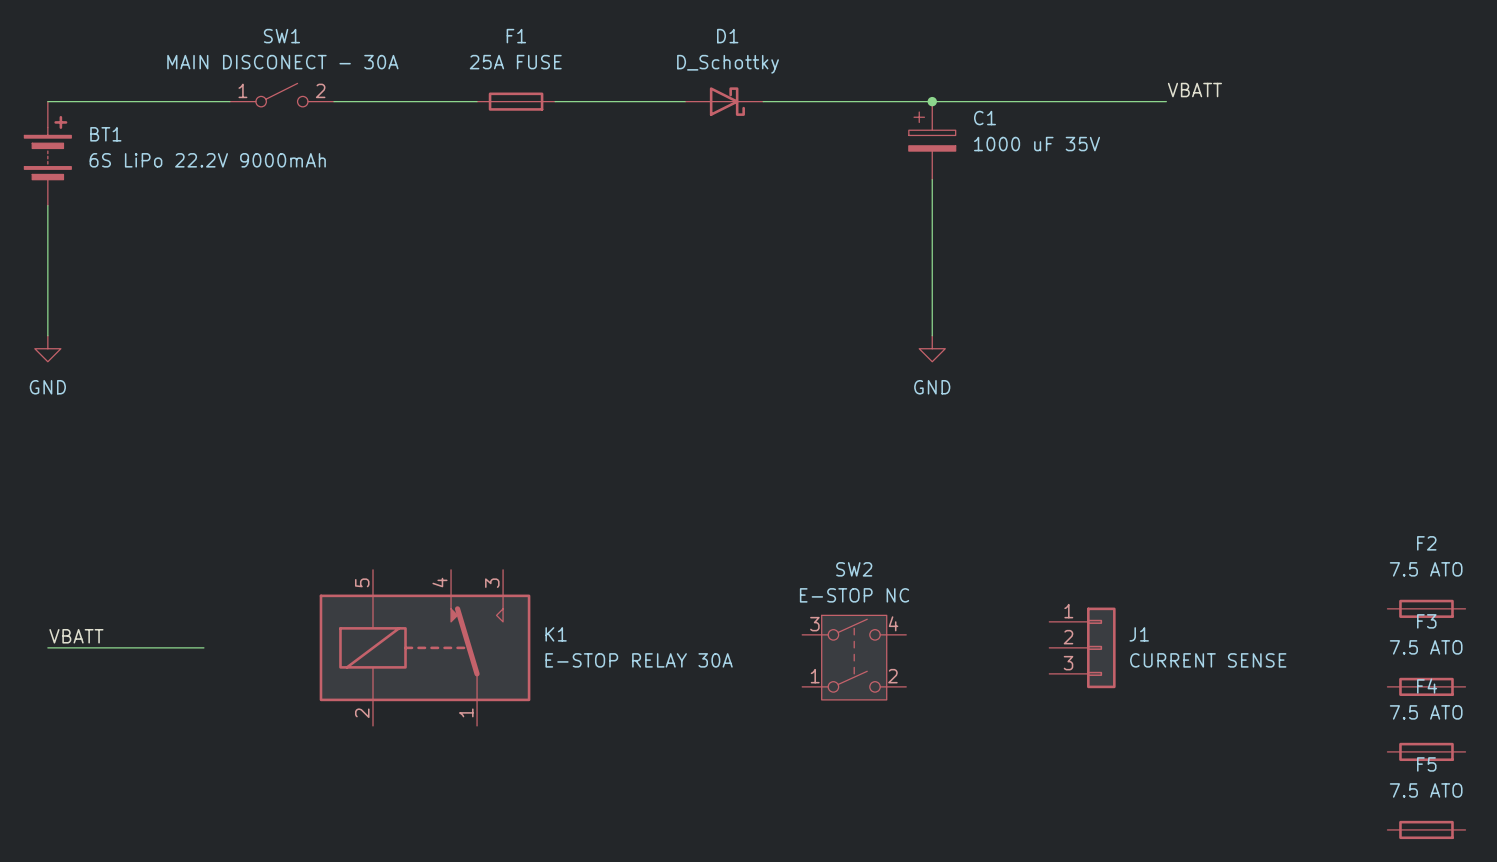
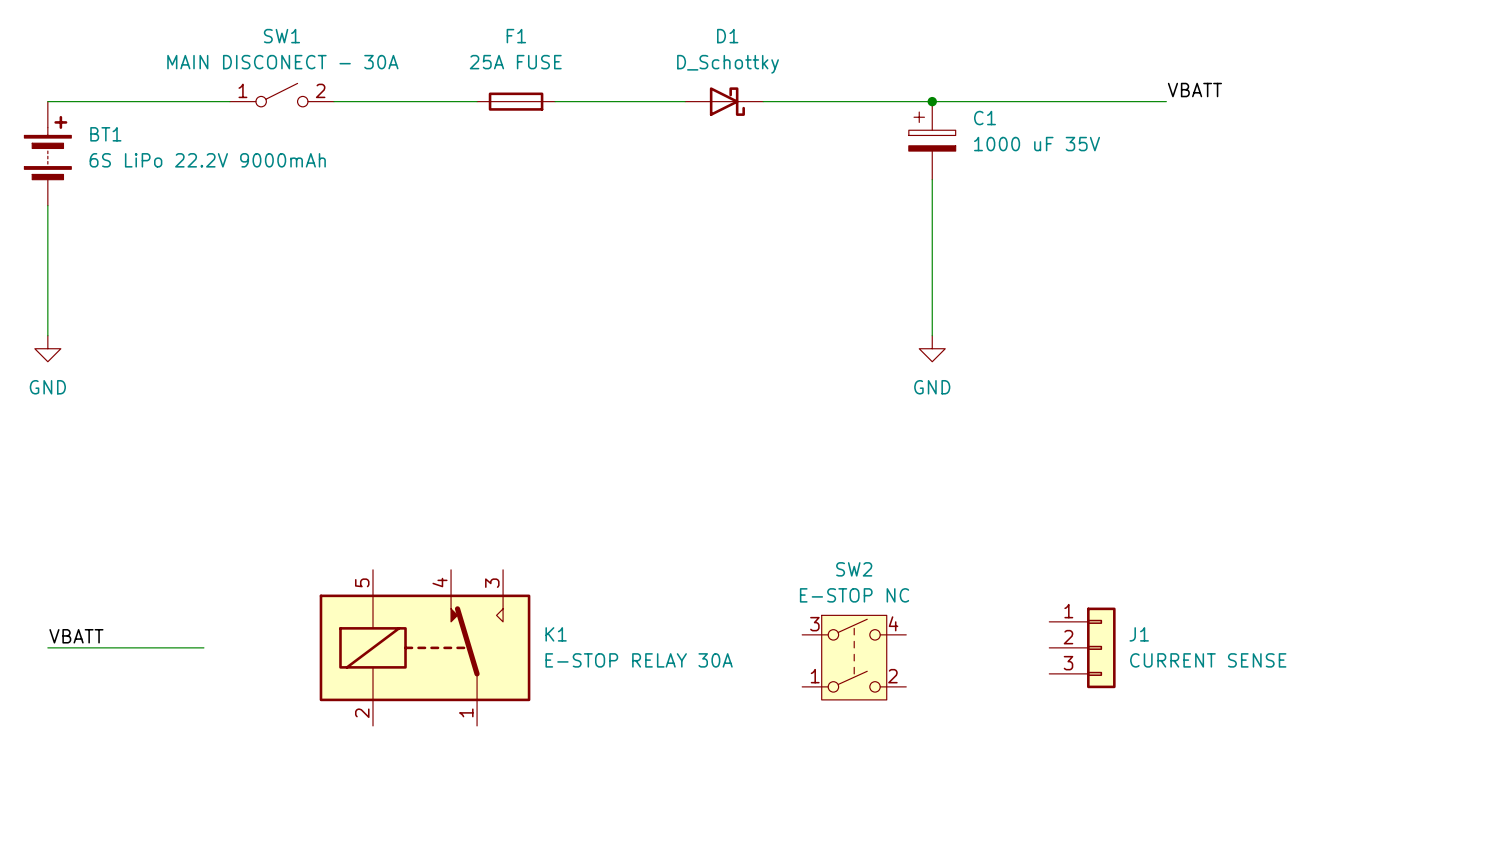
F2: 7.5 ATO (1426, 608) -> none
F3: 7.5 ATO (1426, 686) -> none
F4: 7.5 ATO (1426, 751) -> none
F5: 7.5 ATO (1426, 829) -> none

